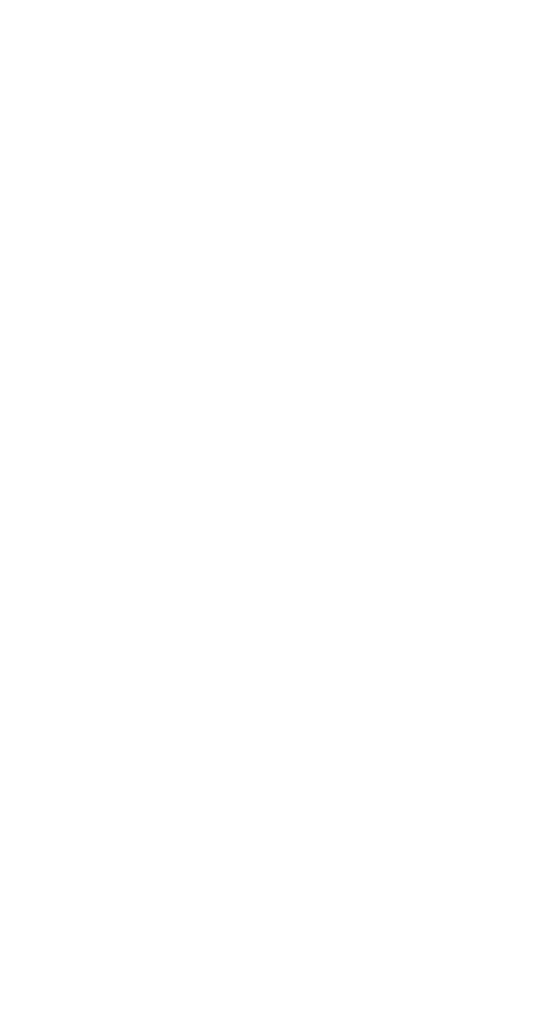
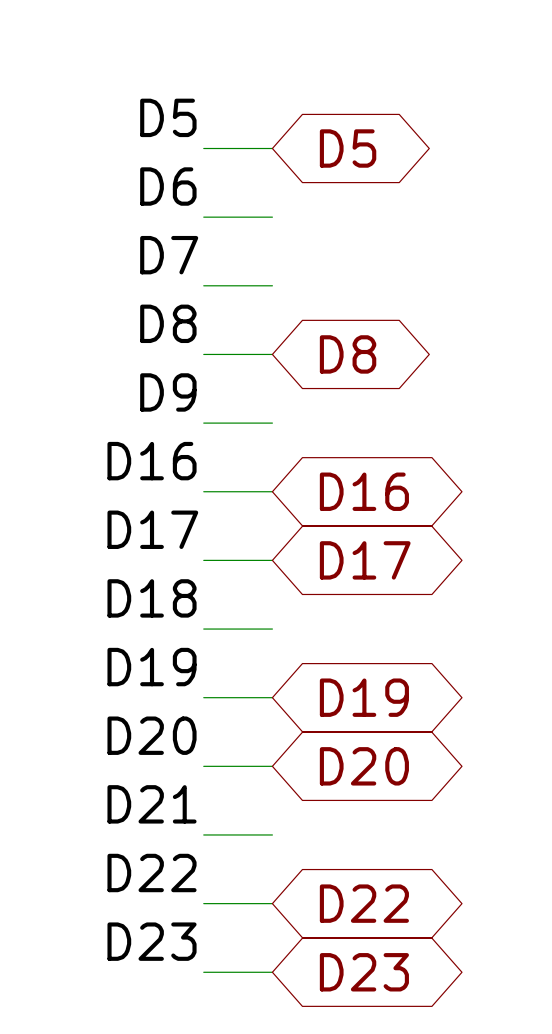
label: none -> D5 (168, 117)
wire: none -> (203, 148) (272, 148)
global label: none -> D5 (348, 148)
label: none -> D6 (168, 186)
wire: none -> (203, 217) (272, 217)
label: none -> D7 (169, 255)
wire: none -> (203, 285) (272, 285)
label: none -> D8 (168, 323)
wire: none -> (203, 354) (272, 354)
global label: none -> D8 (348, 354)
label: none -> D9 (168, 392)
wire: none -> (203, 423) (272, 423)
label: none -> D16 (152, 461)
wire: none -> (203, 491) (272, 491)
global label: none -> D16 (364, 491)
label: none -> D17 (152, 529)
wire: none -> (203, 560) (272, 560)
global label: none -> D17 (365, 560)
label: none -> D18 (152, 598)
wire: none -> (203, 629) (272, 629)
label: none -> D19 (152, 667)
wire: none -> (203, 697) (272, 697)
global label: none -> D19 (364, 697)
label: none -> D20 (152, 735)
wire: none -> (203, 766) (272, 766)
global label: none -> D20 (364, 766)
label: none -> D21 (152, 804)
wire: none -> (203, 834) (272, 834)
label: none -> D22 (152, 873)
wire: none -> (203, 903) (272, 903)
global label: none -> D22 (364, 903)
label: none -> D23 (152, 941)
wire: none -> (203, 972) (272, 972)
global label: none -> D23 (364, 972)

